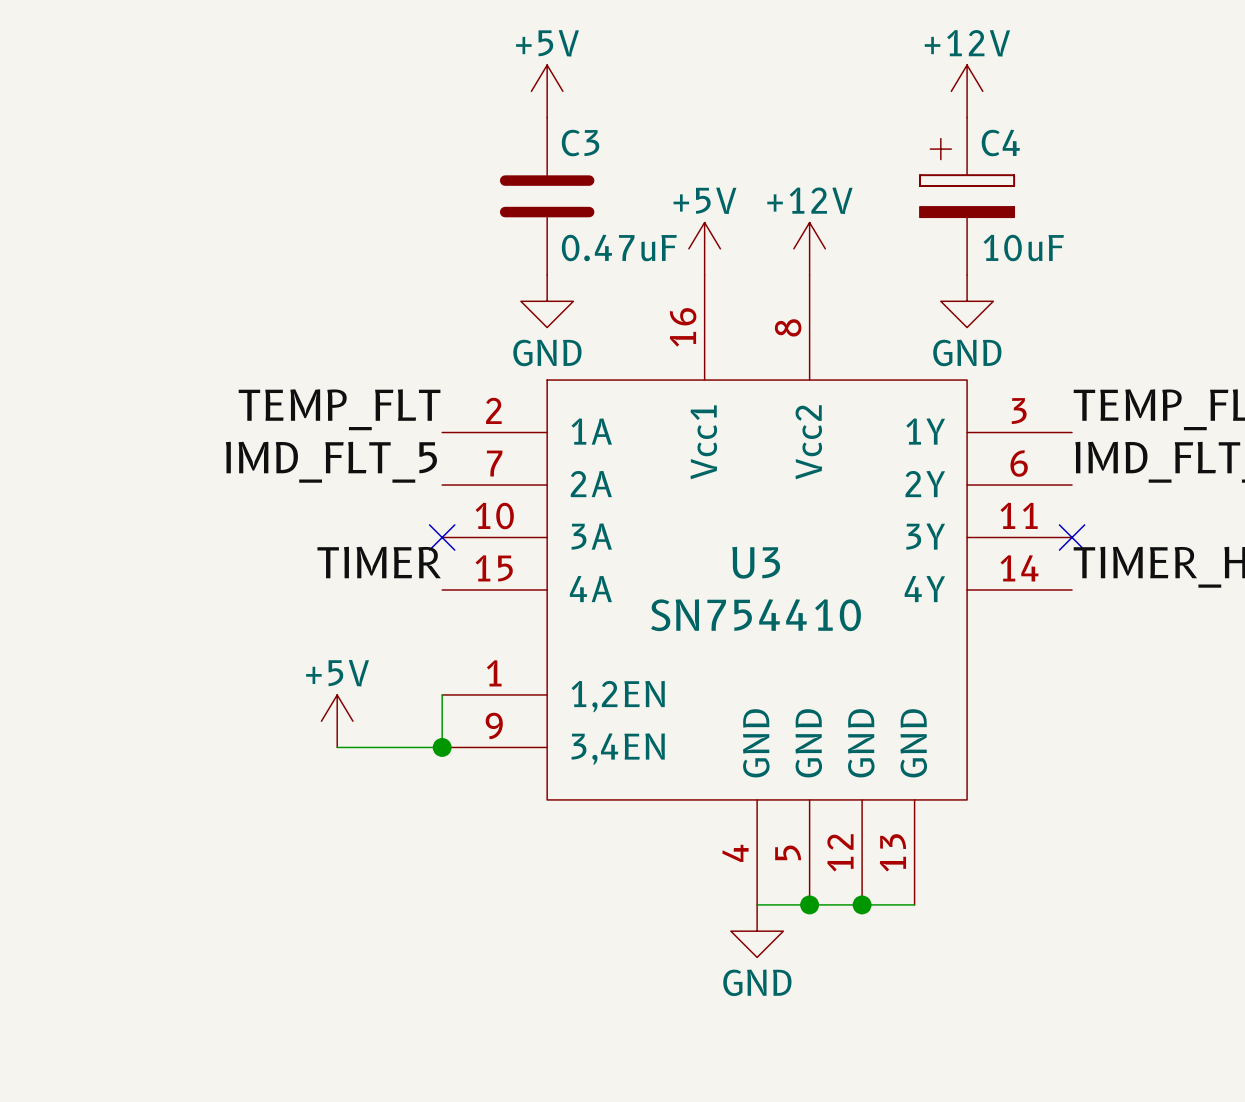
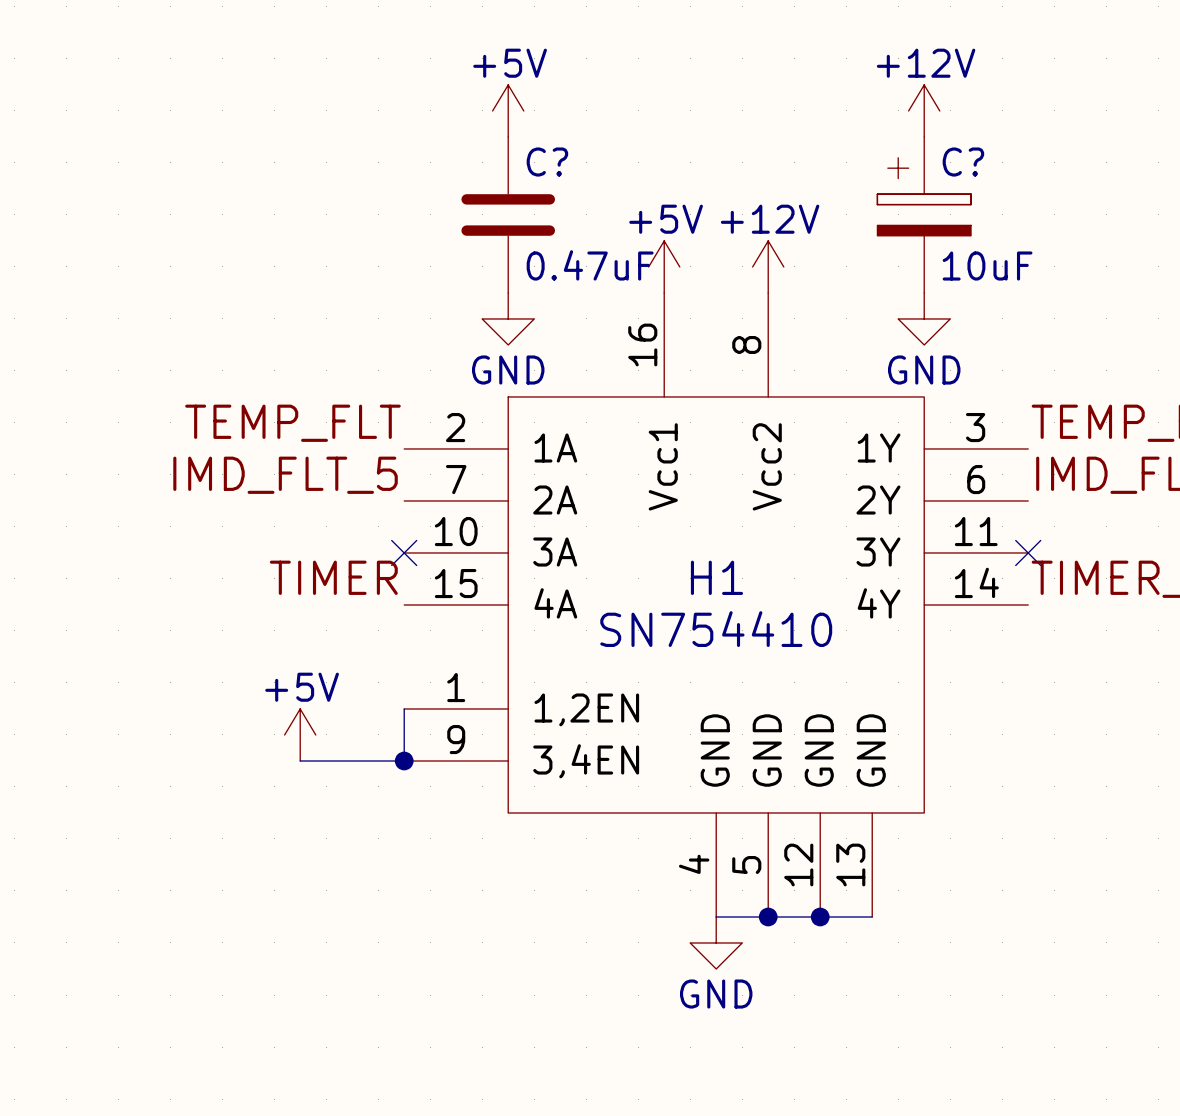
C3 name: C3 (580, 143) -> C? (547, 162)
C4 name: C4 (1000, 143) -> C? (963, 162)
U3 name: U3 (756, 562) -> H1 (716, 577)

